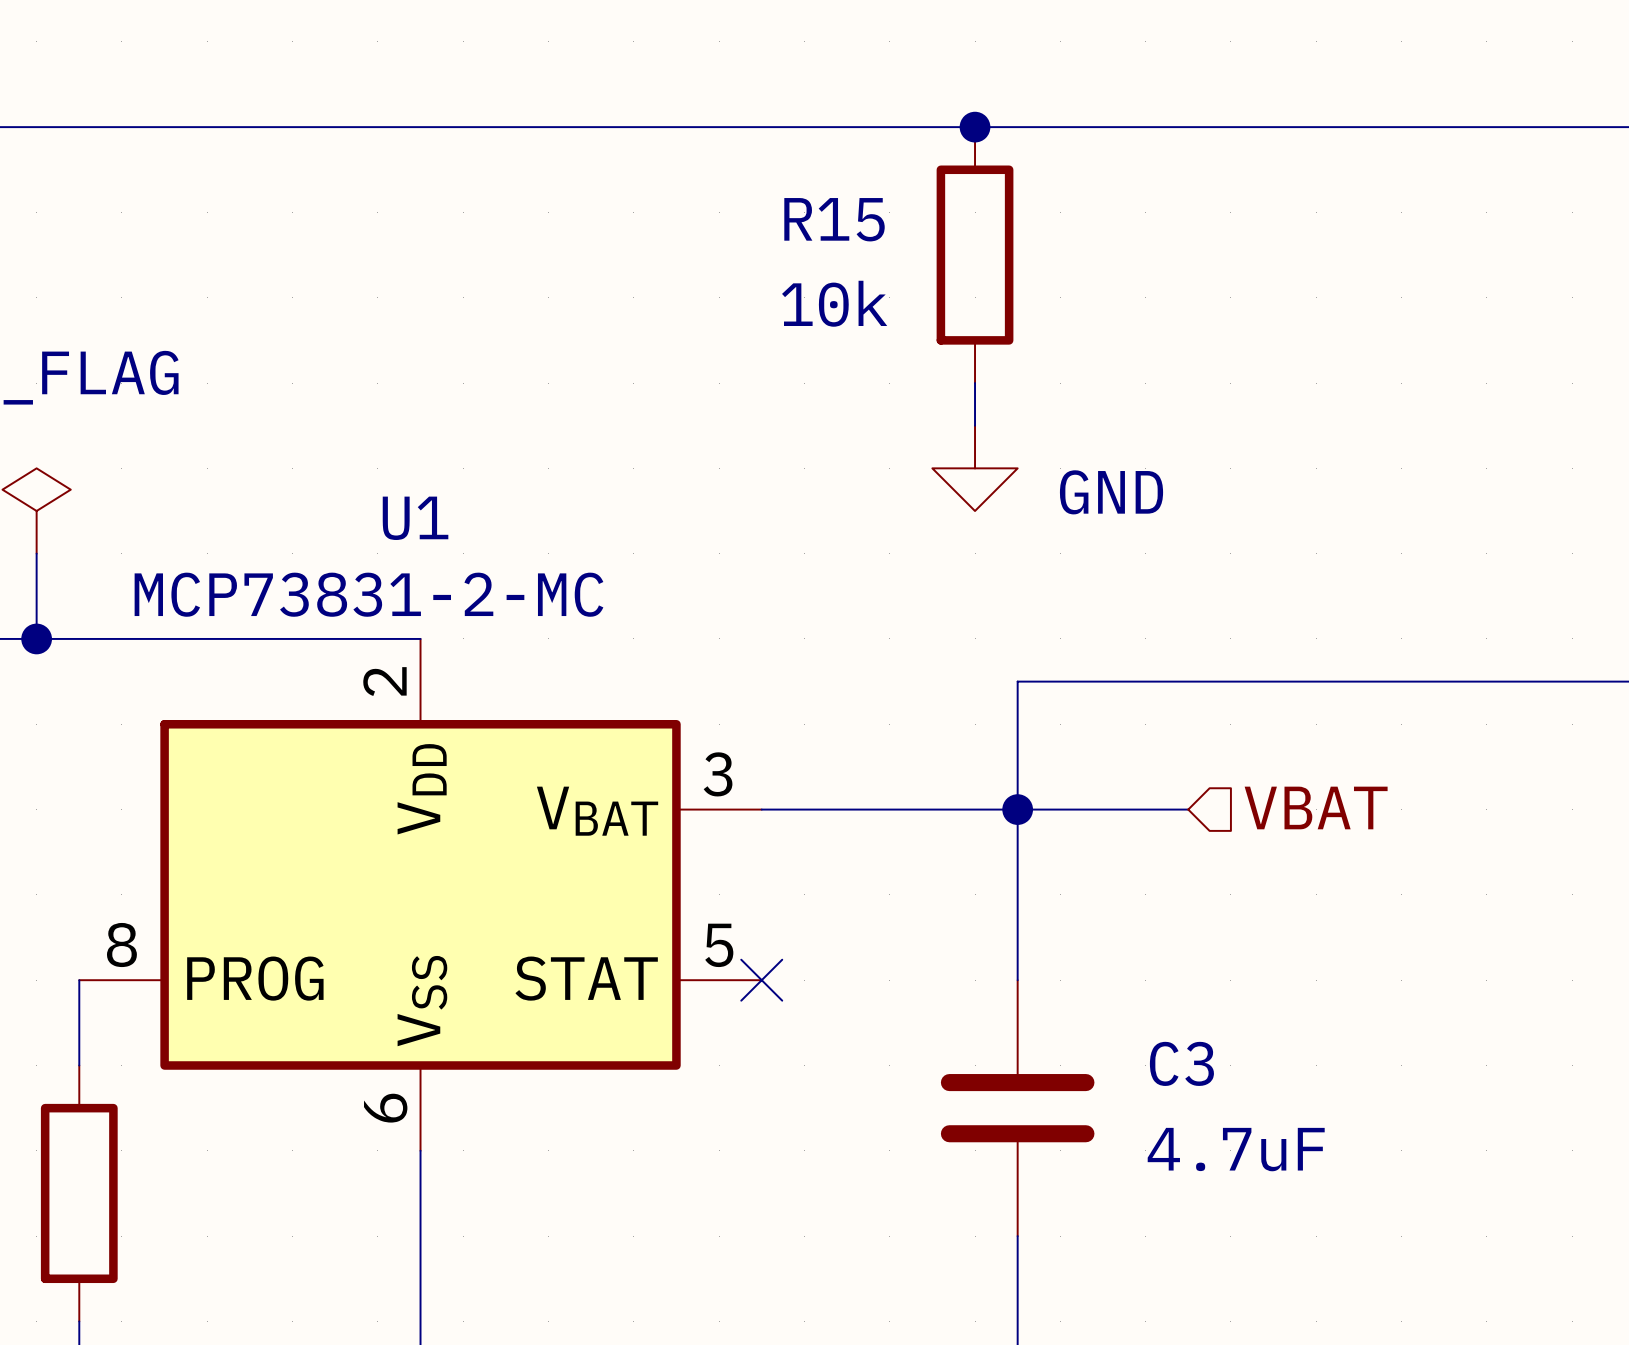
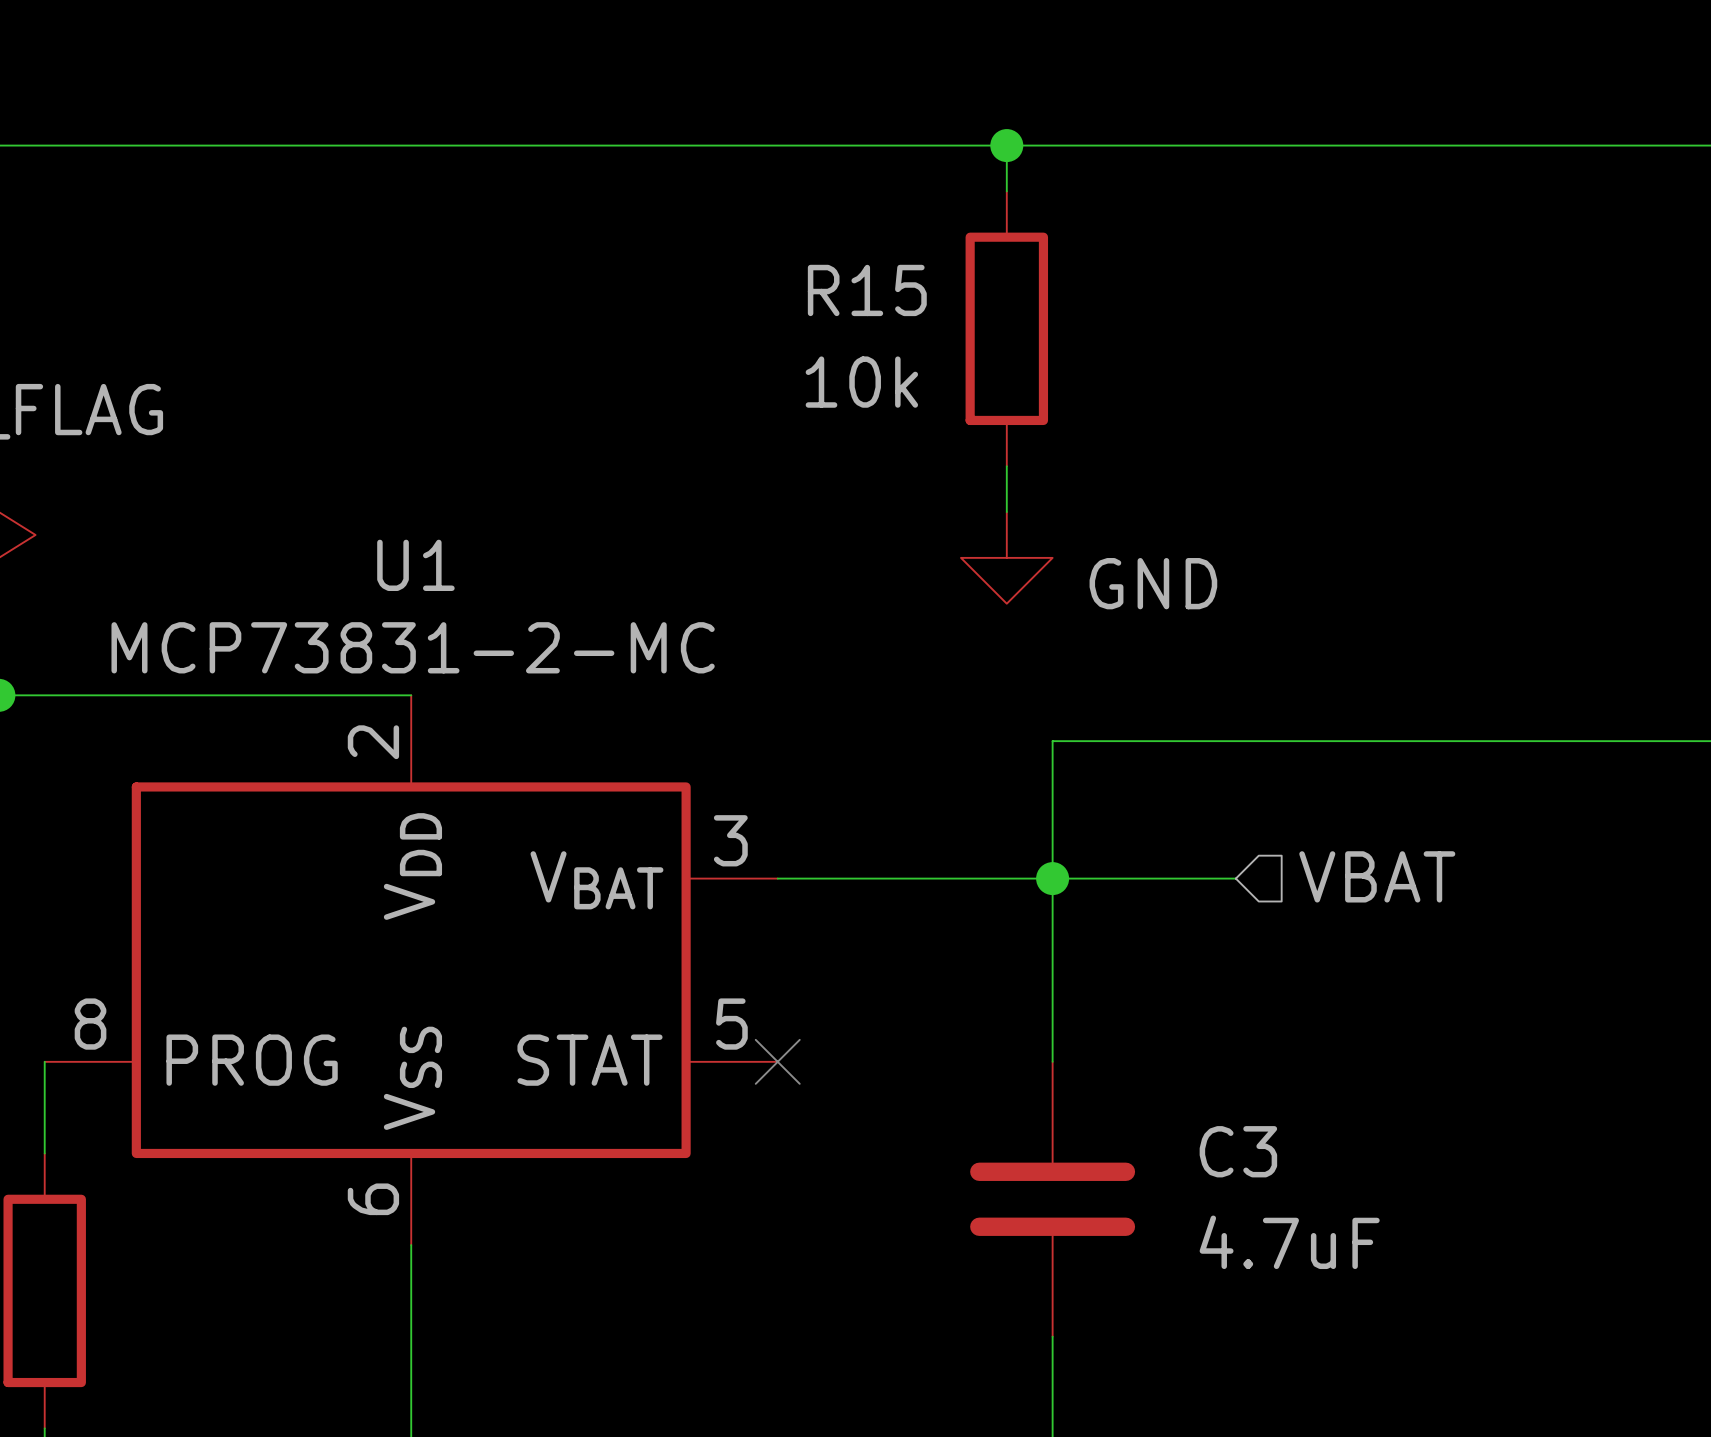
R15 position: (975, 255) -> (1006, 328)
power symbol position: GND (975, 468) -> GND (1006, 557)

